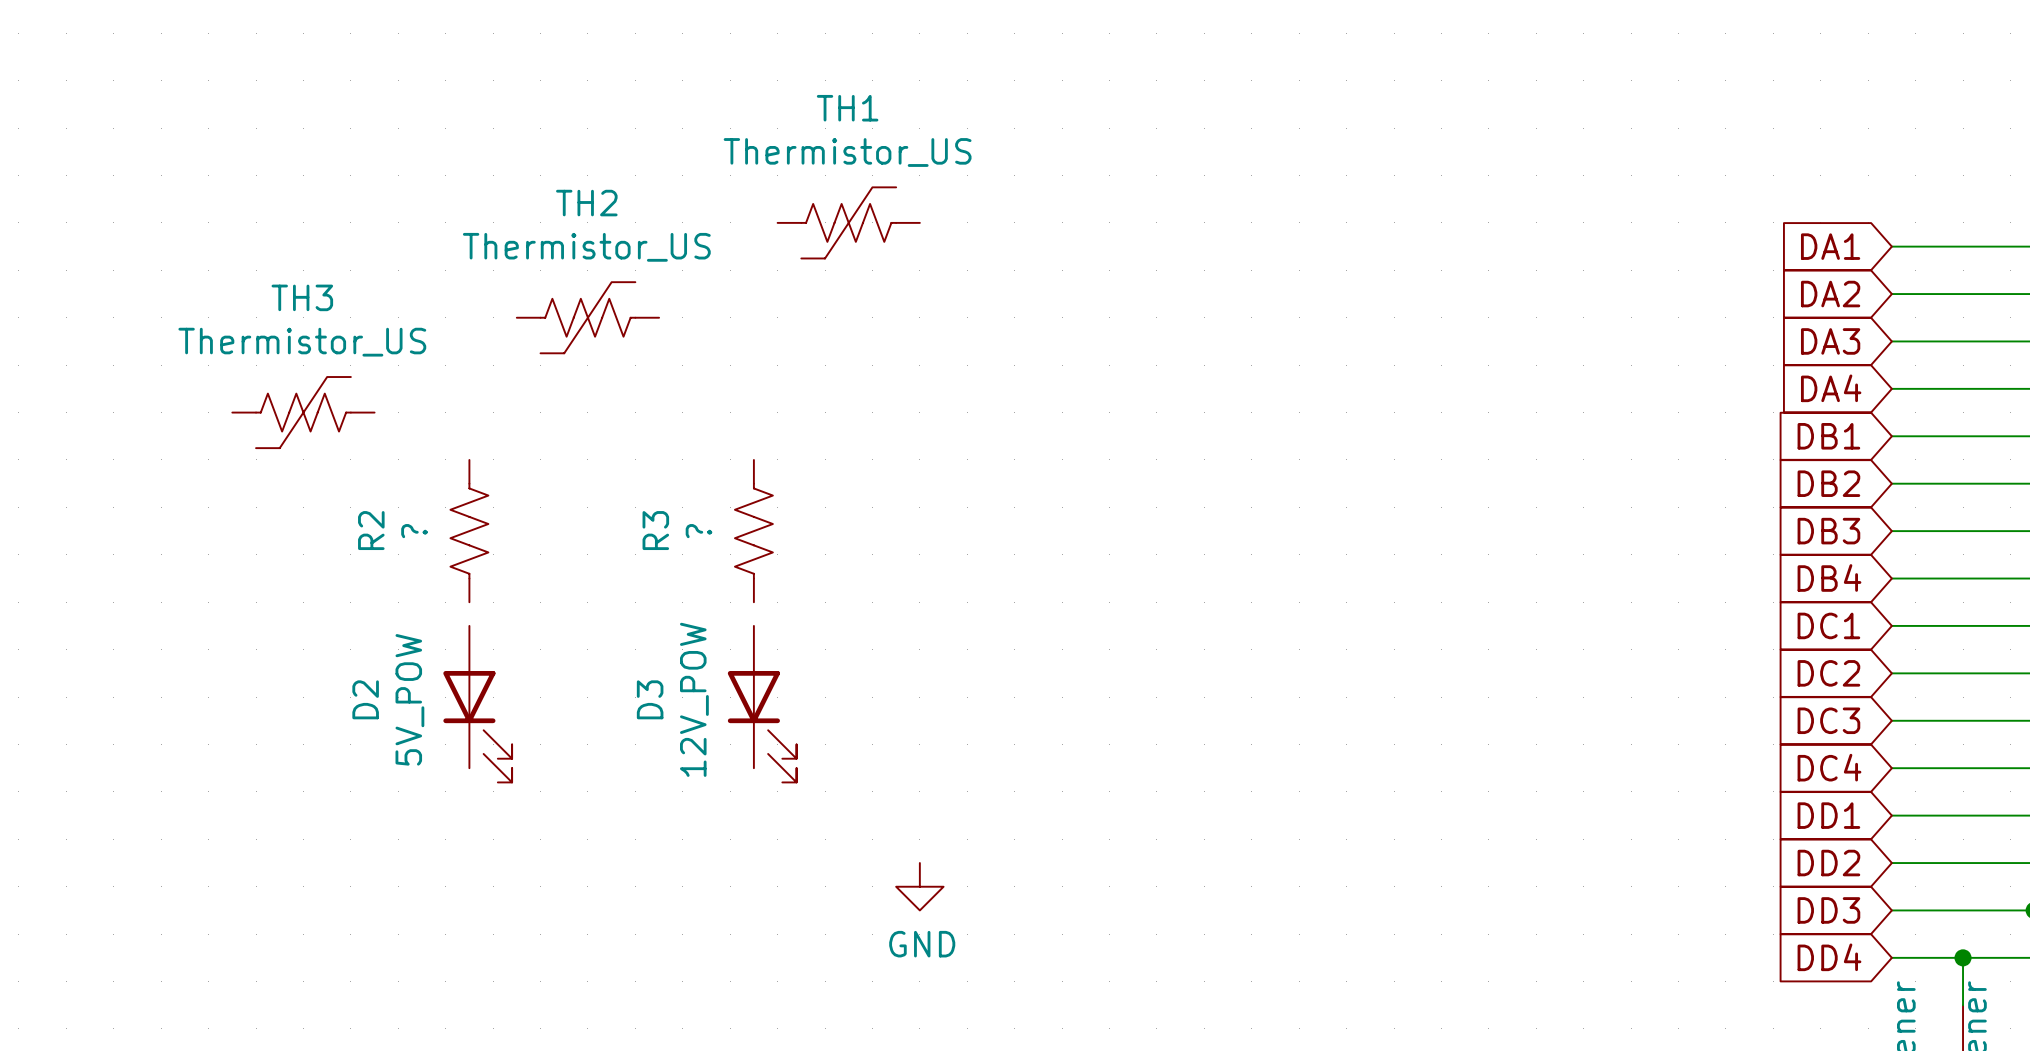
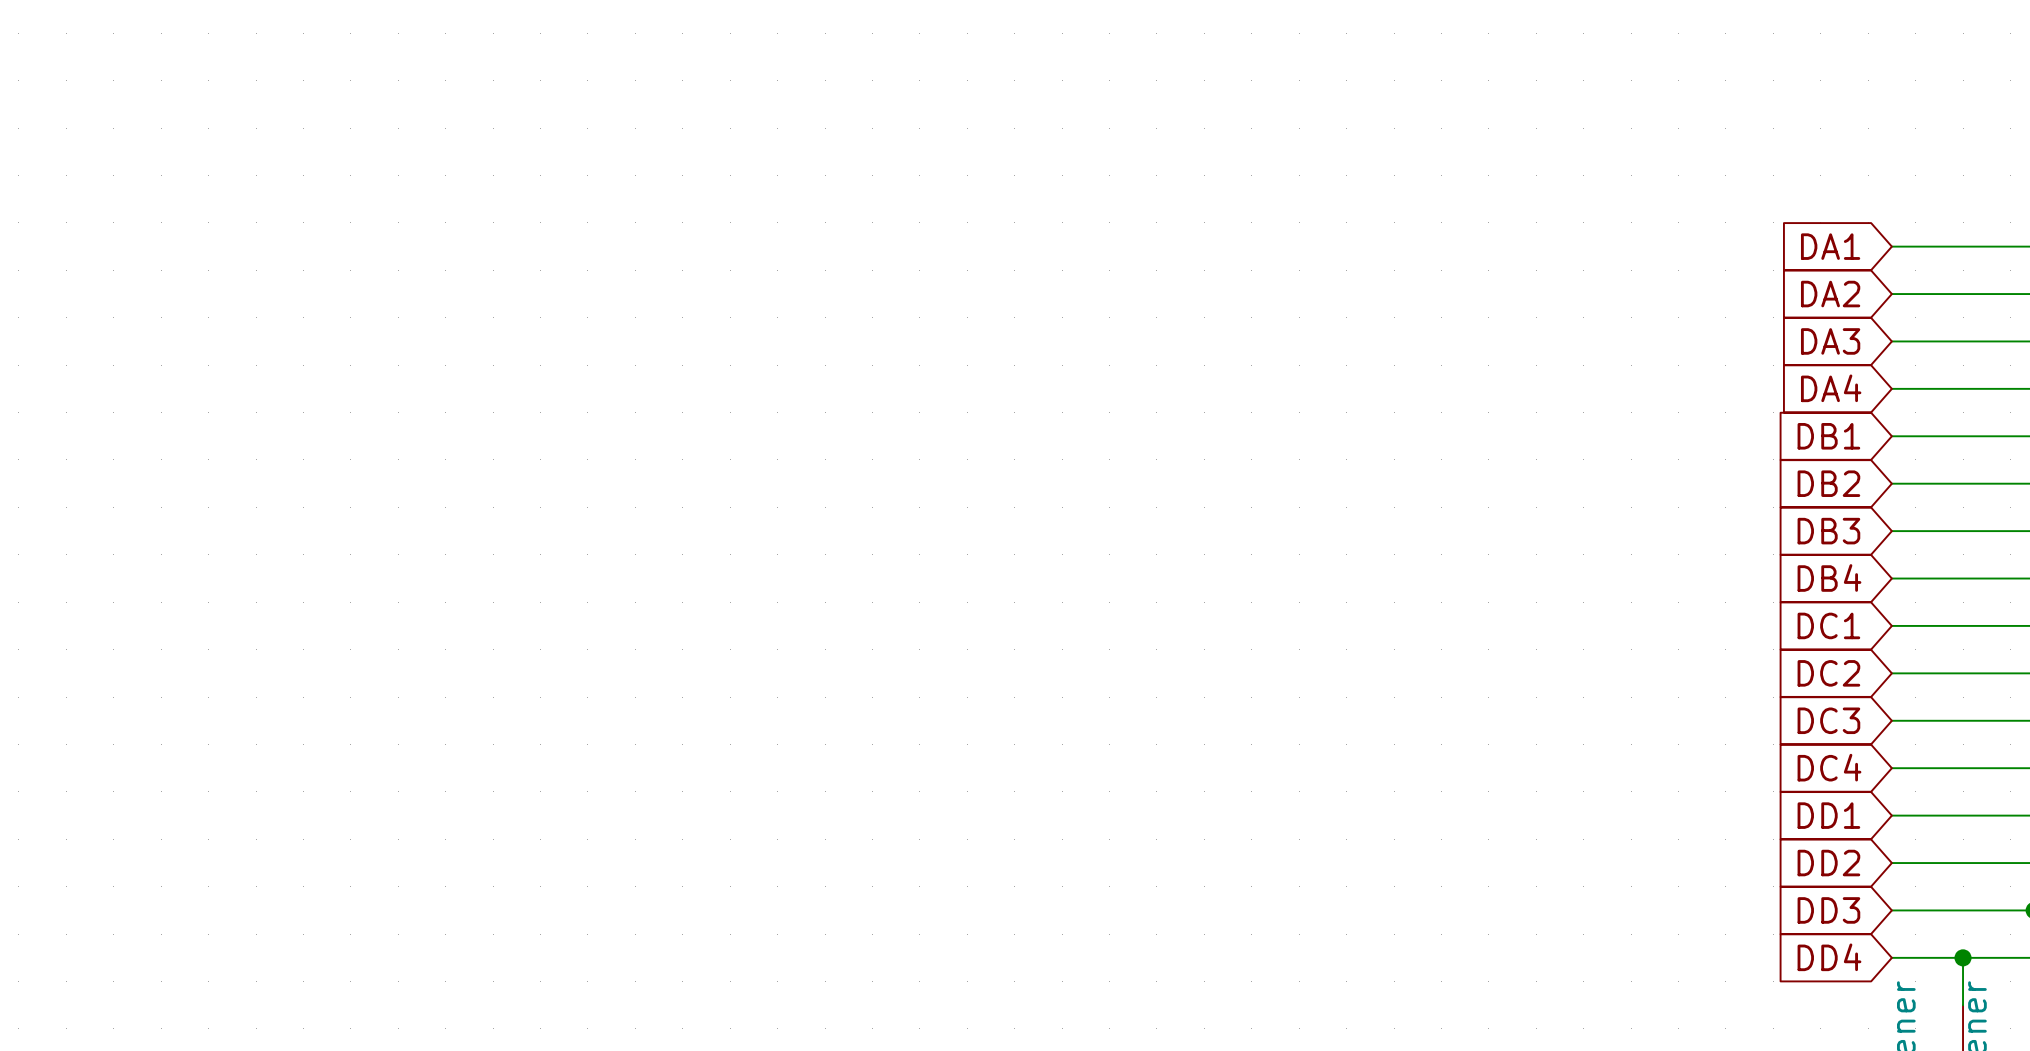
TH1: Thermistor_US (848, 222) -> none
TH2: Thermistor_US (587, 317) -> none
TH3: Thermistor_US (303, 412) -> none
R2: ? (469, 531) -> none
R3: ? (753, 531) -> none
D2: 5V_POW (477, 704) -> none
D3: 12V_POW (762, 704) -> none
power symbol: GND (919, 886) -> none

